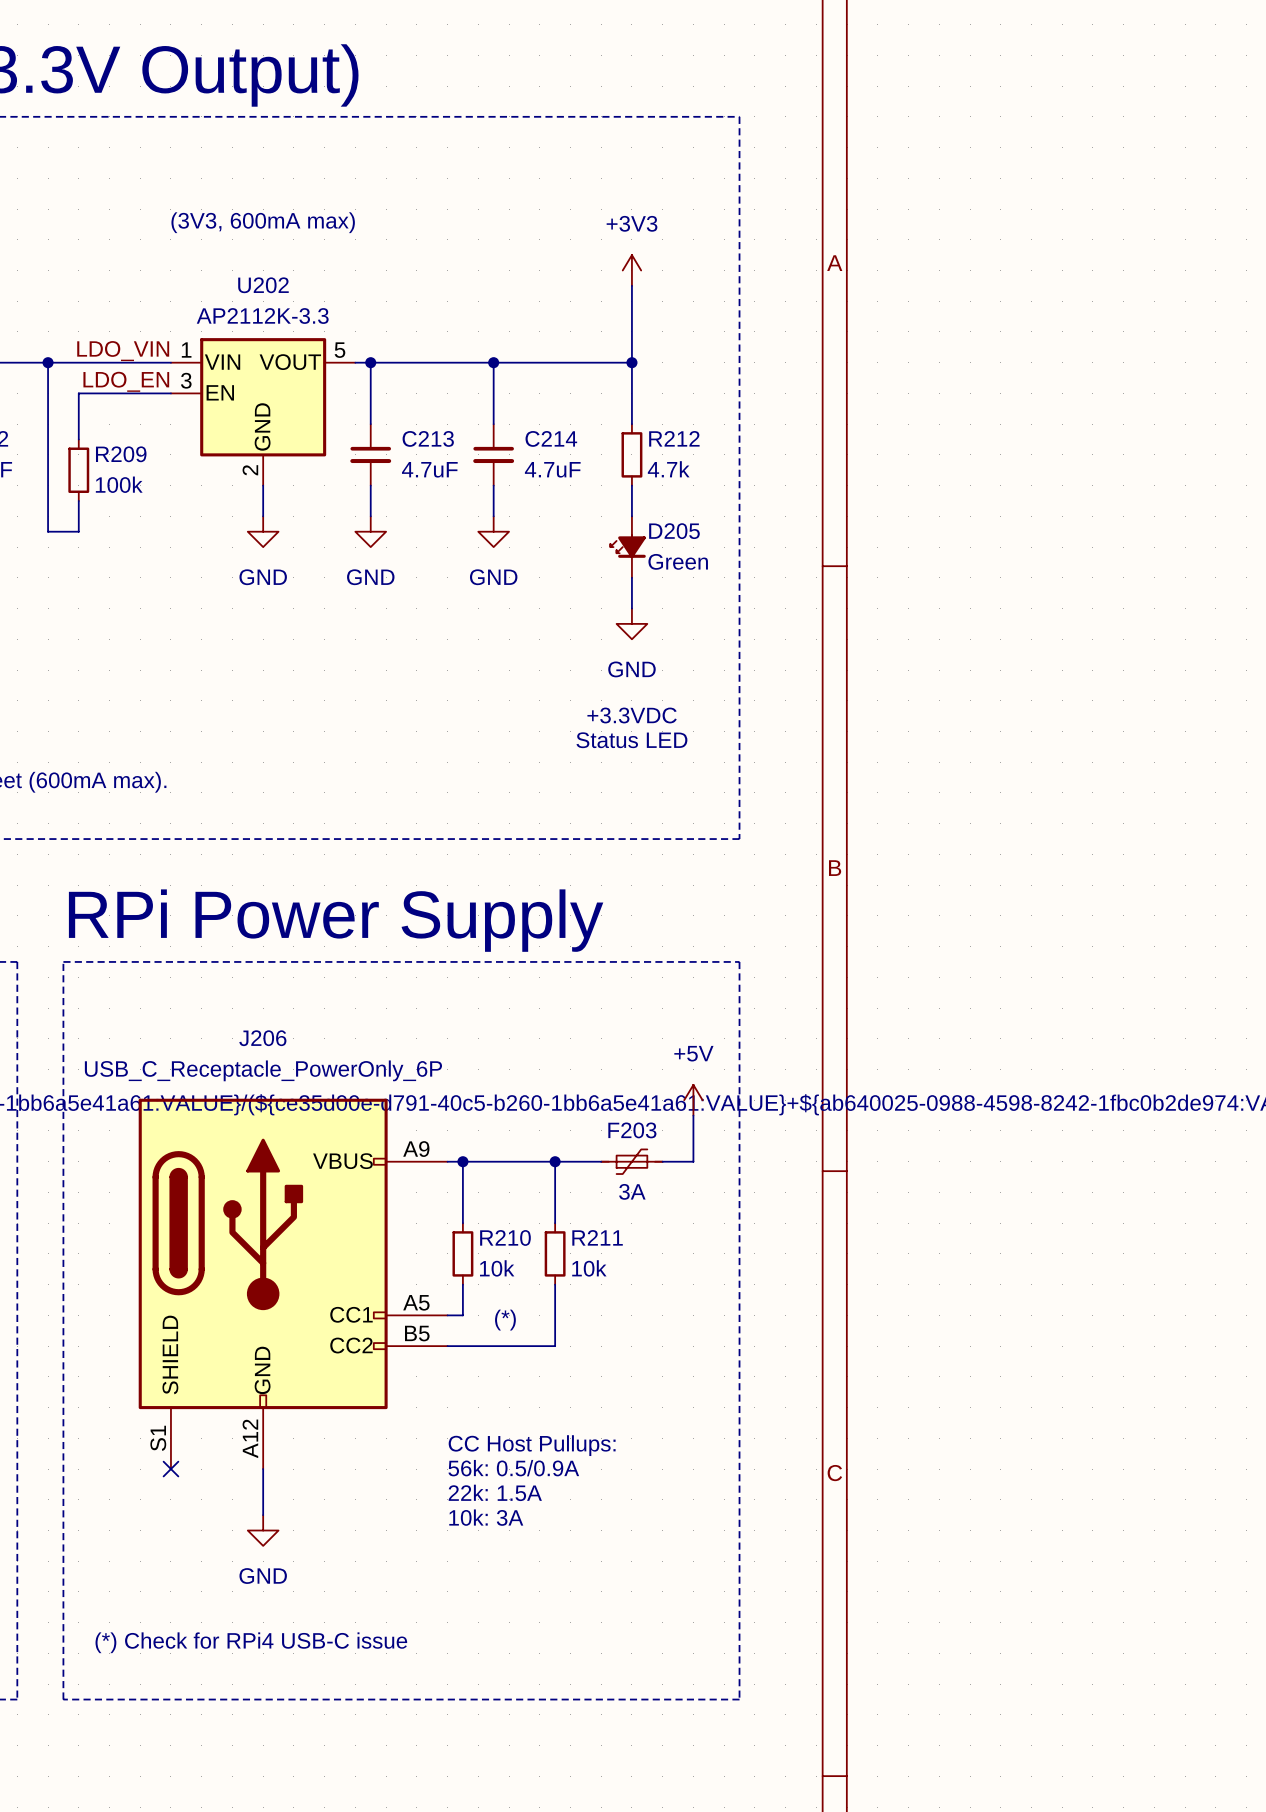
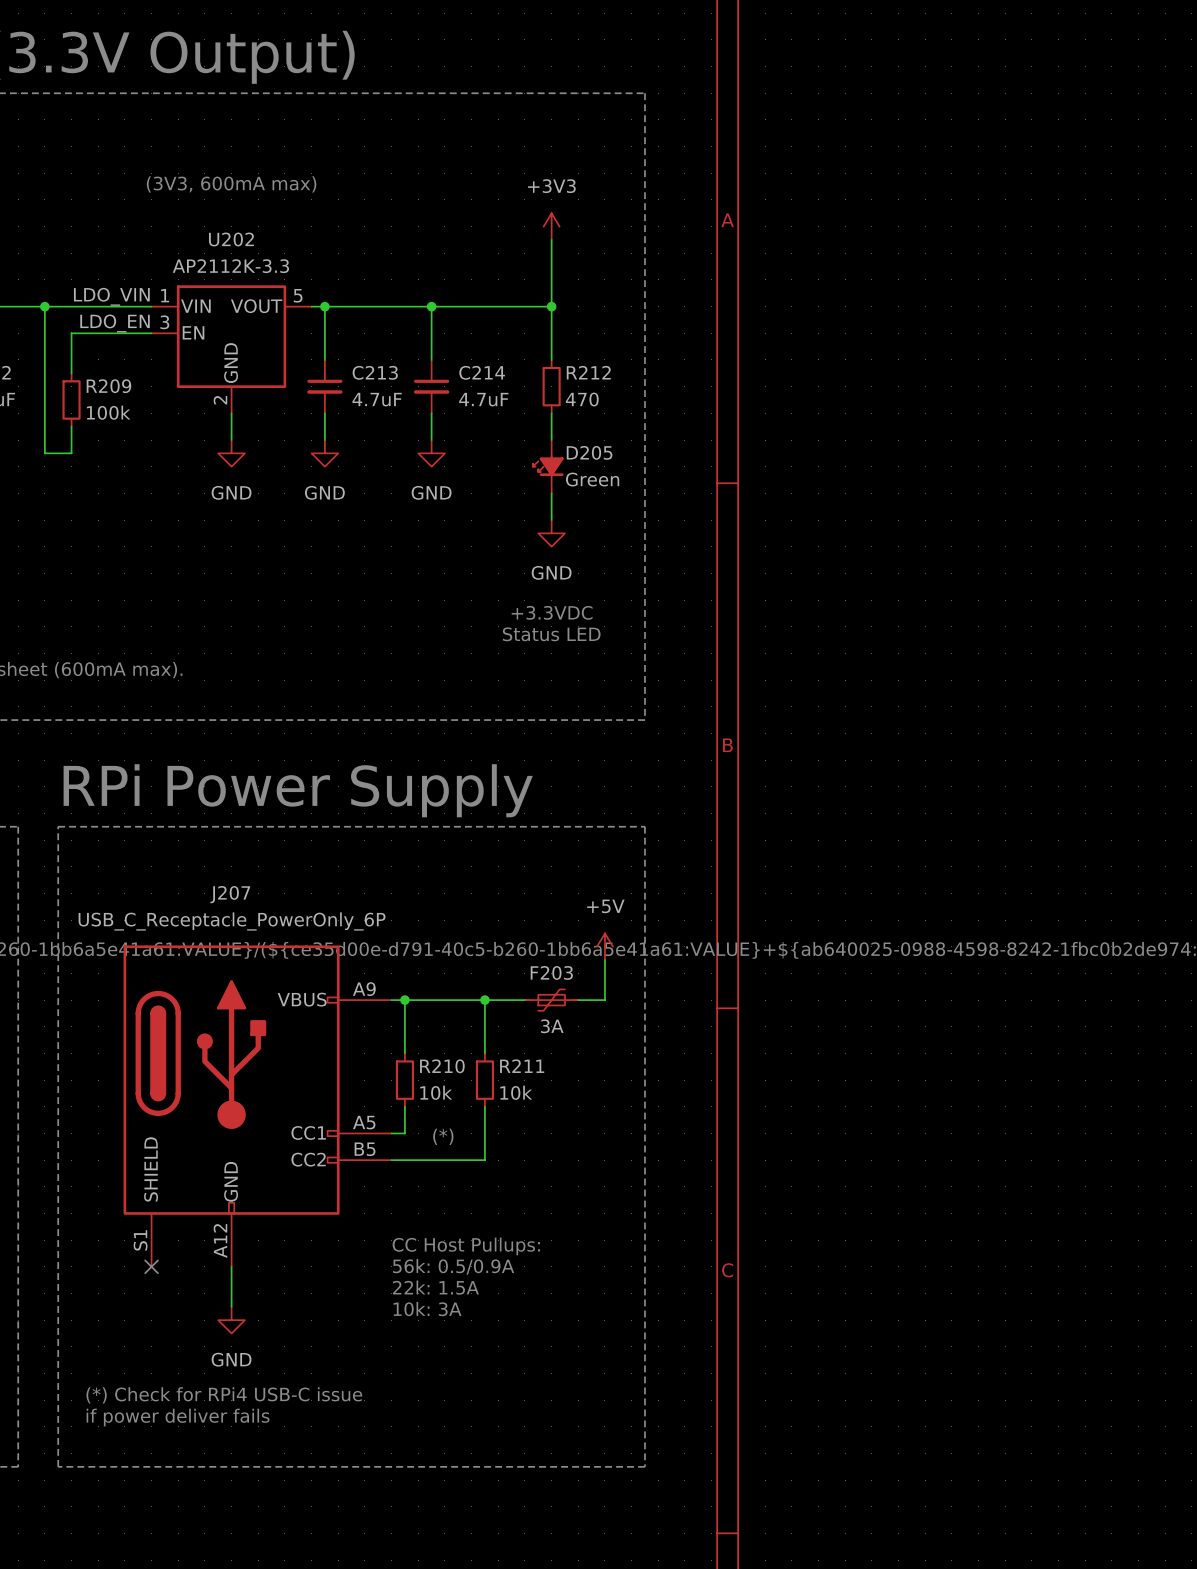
R212 value: 4.7k (668, 469) -> 470 (582, 399)
J206 name: J206 (262, 1038) -> J207 (230, 894)
text: none -> (*) Check for RPi4 USB-C issue (224, 1395)
text: (*) Check for RPi4 USB-C issue (251, 1642) -> if power deliver fails (178, 1417)

